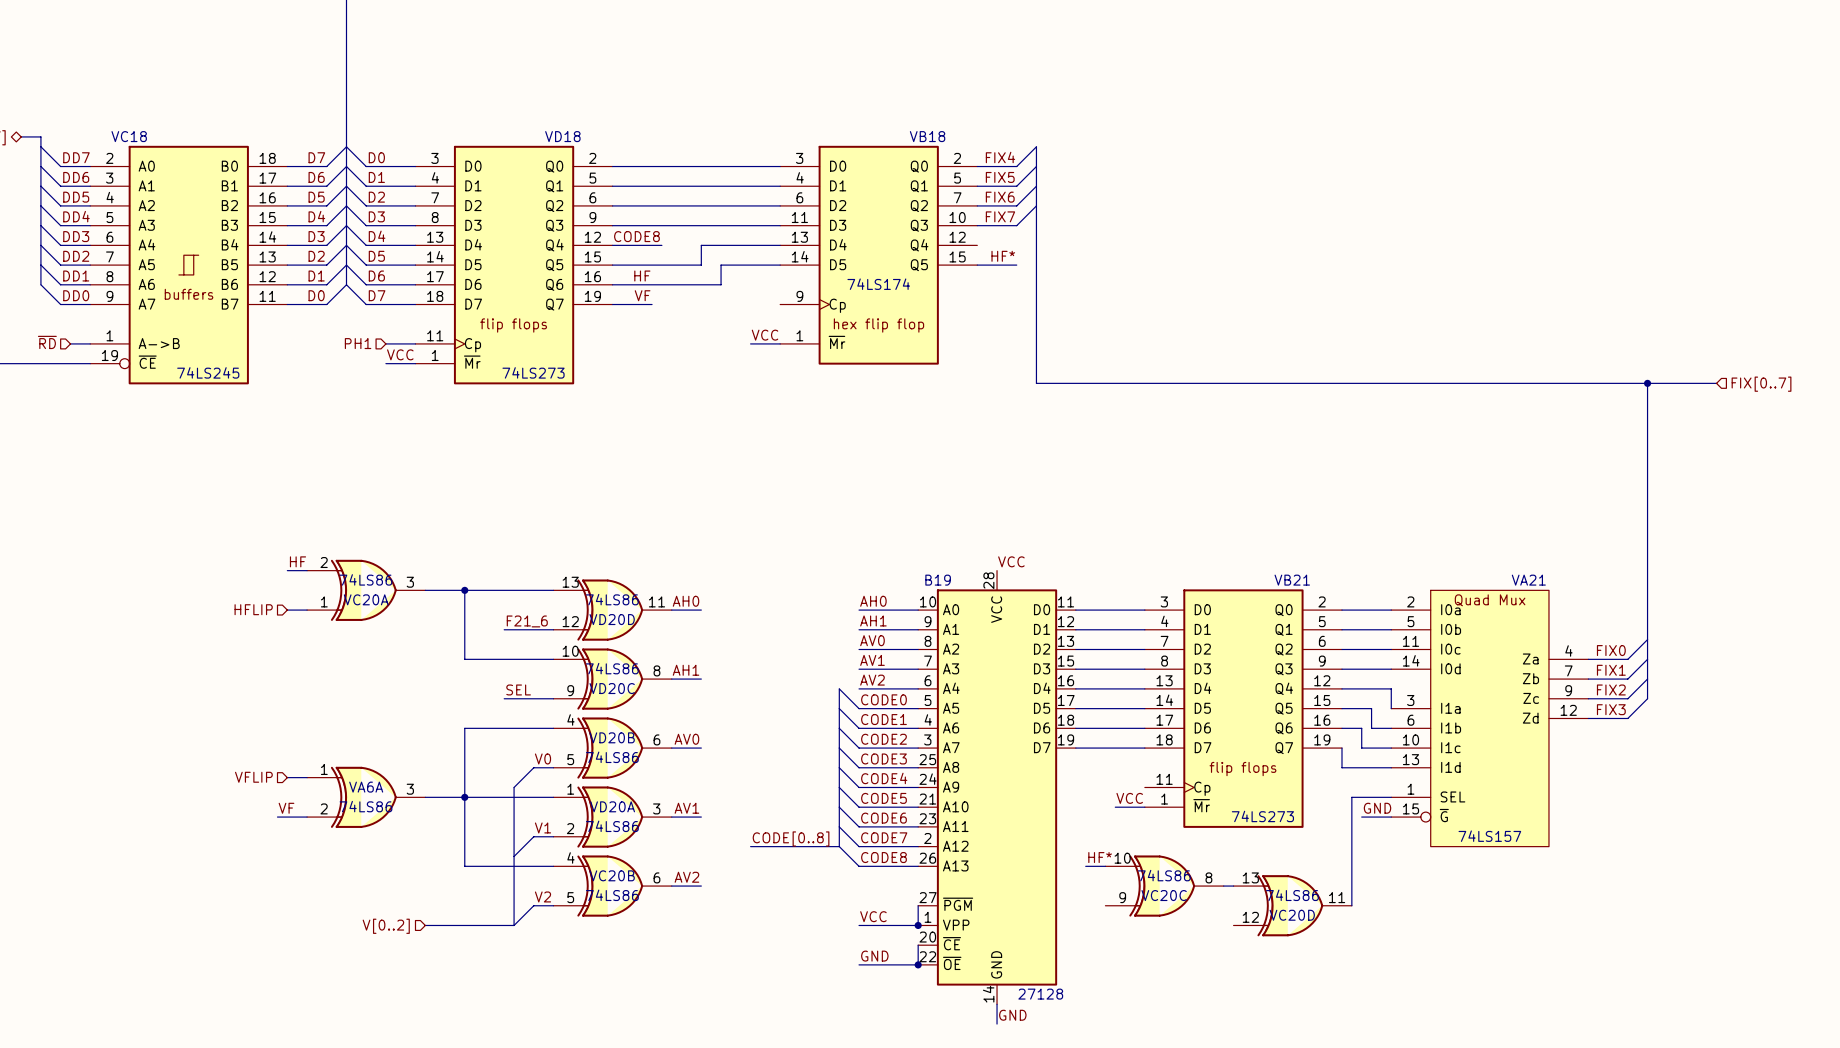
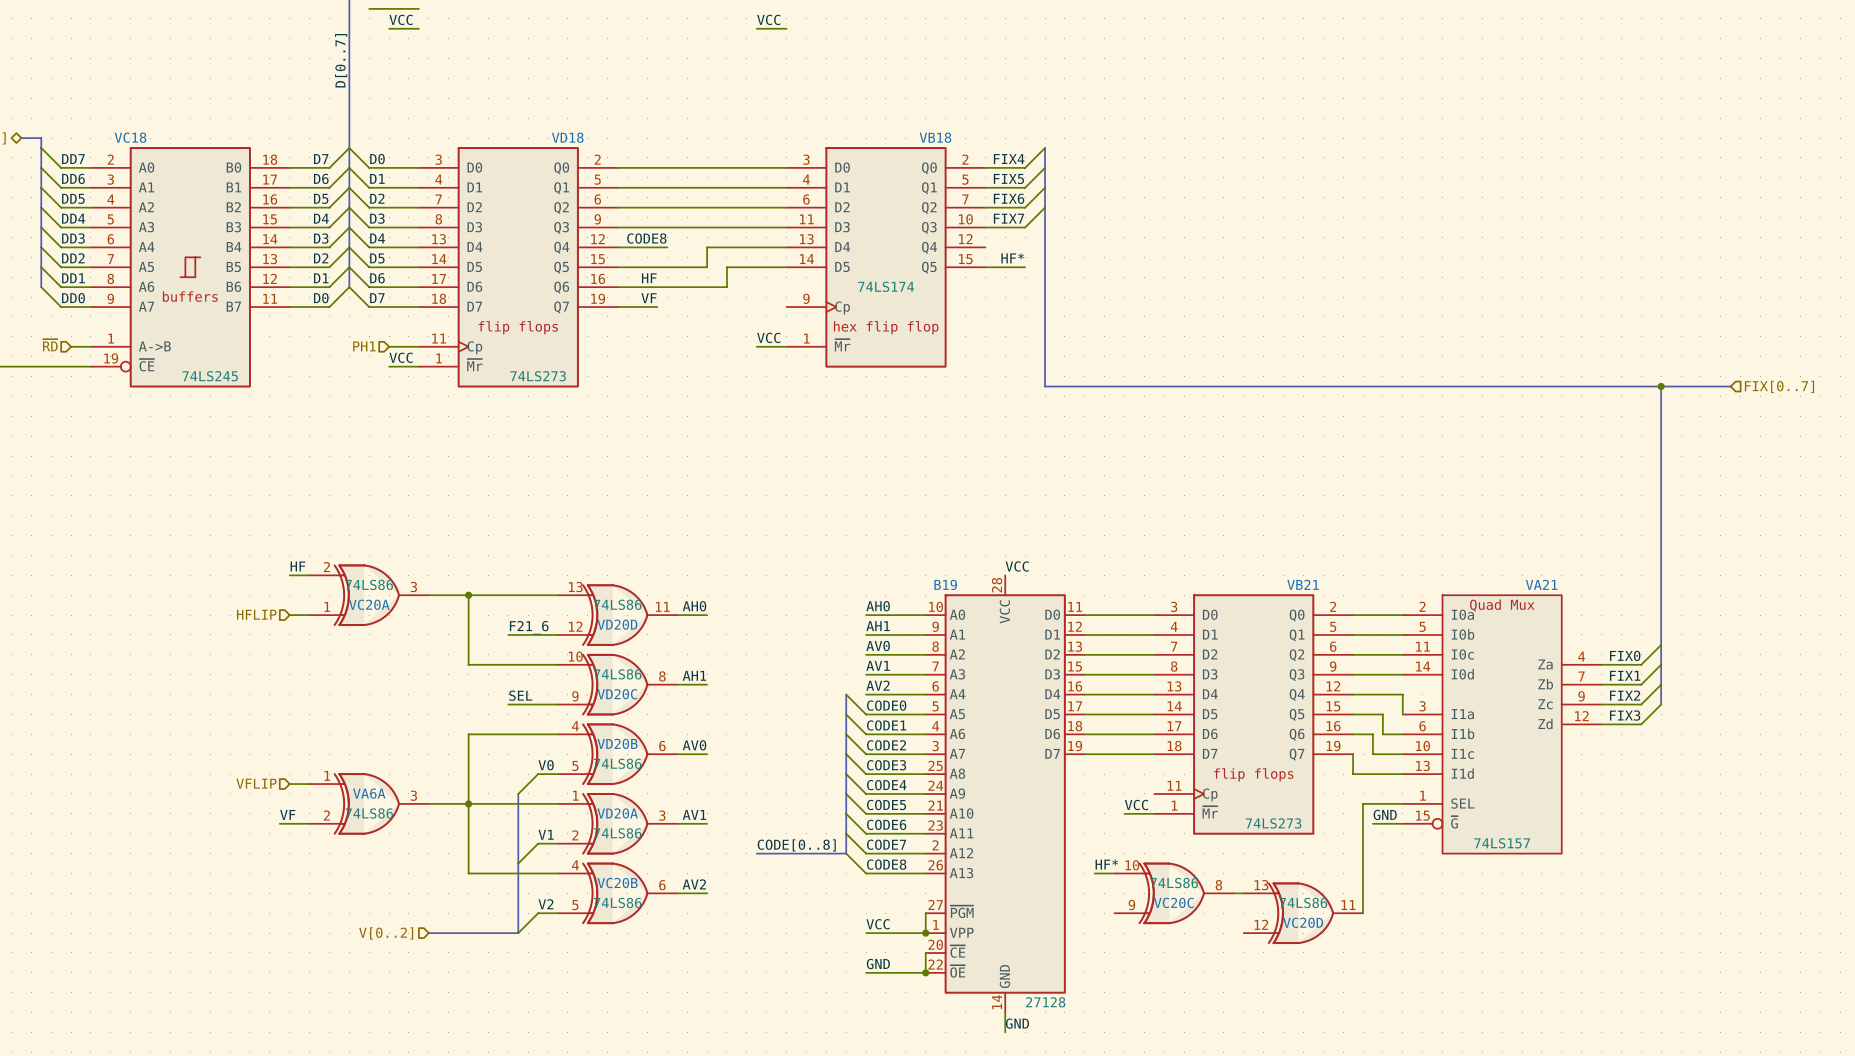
wire: none -> (369, 8) (418, 8)
label: none -> VCC (401, 19)
label: none -> VCC (768, 19)
wire: none -> (389, 28) (418, 28)
wire: none -> (756, 28) (786, 28)
label: none -> D[0..7] (341, 60)

